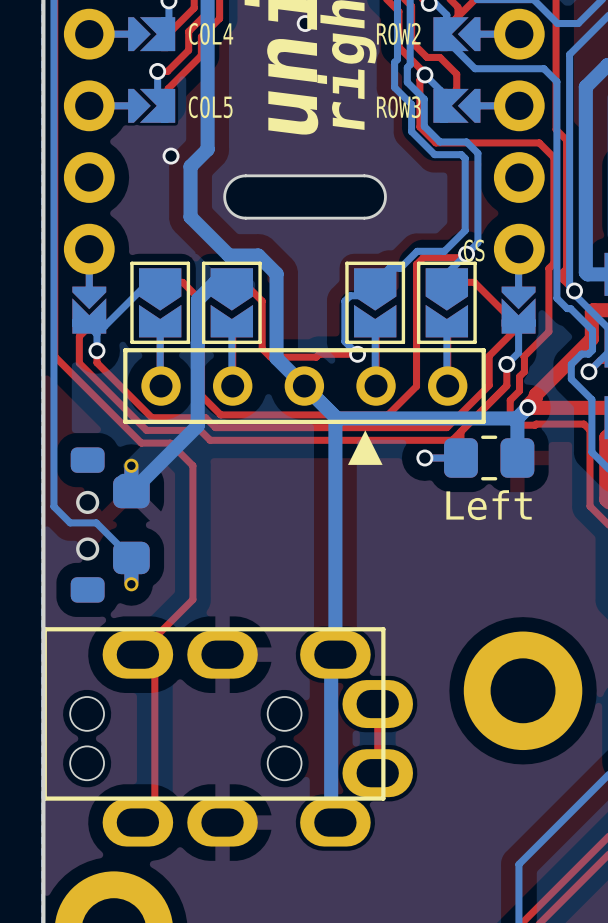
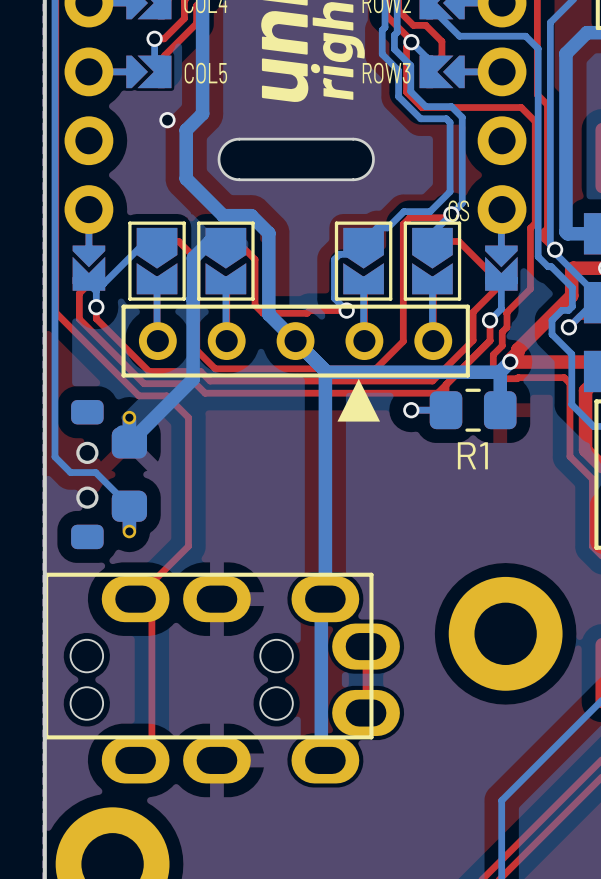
Left name: Left (489, 505) -> R1 (472, 455)

